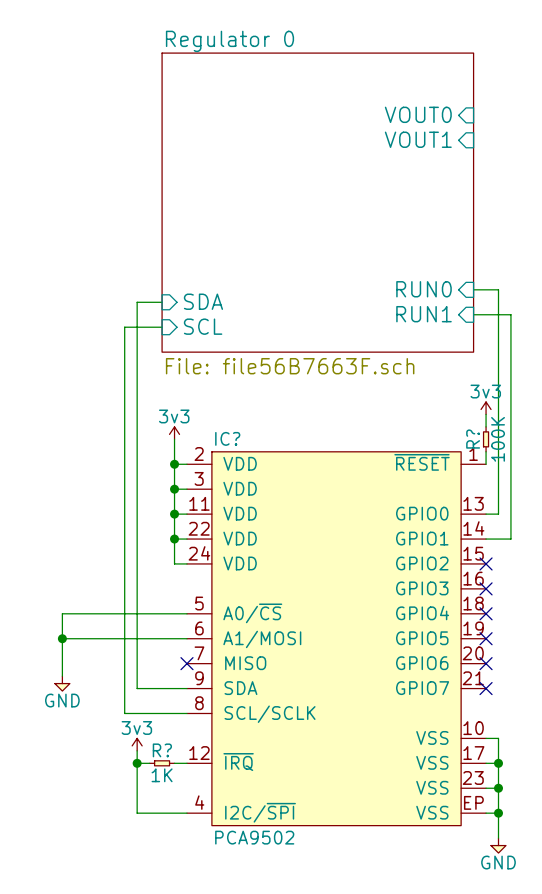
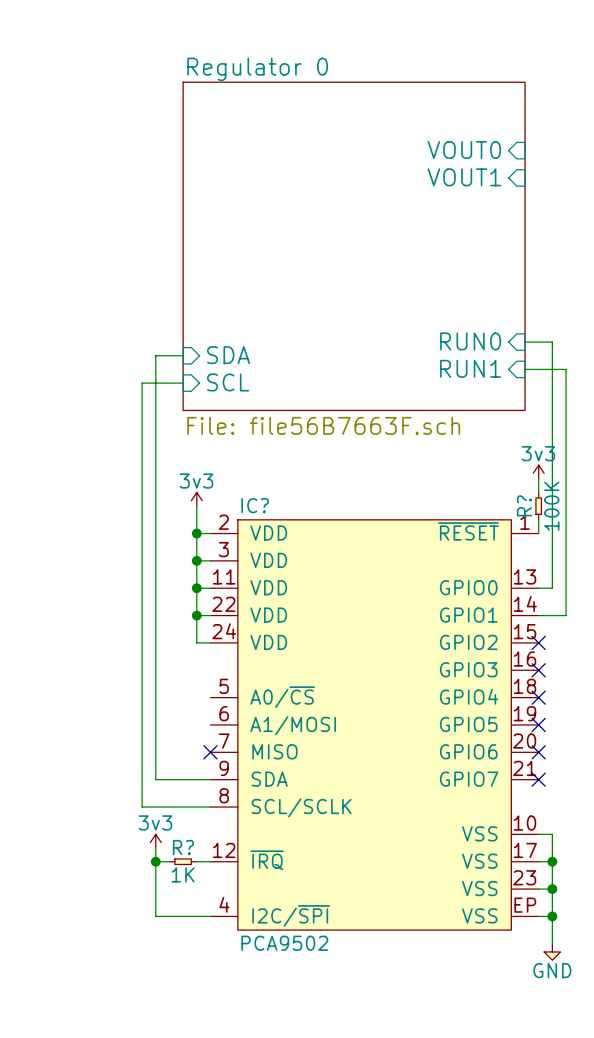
wire: (186, 613) (62, 613) (62, 676) -> none
wire: (62, 638) (186, 638) -> none
junction: (62, 638) -> none
power symbol: GND (62, 683) -> none

